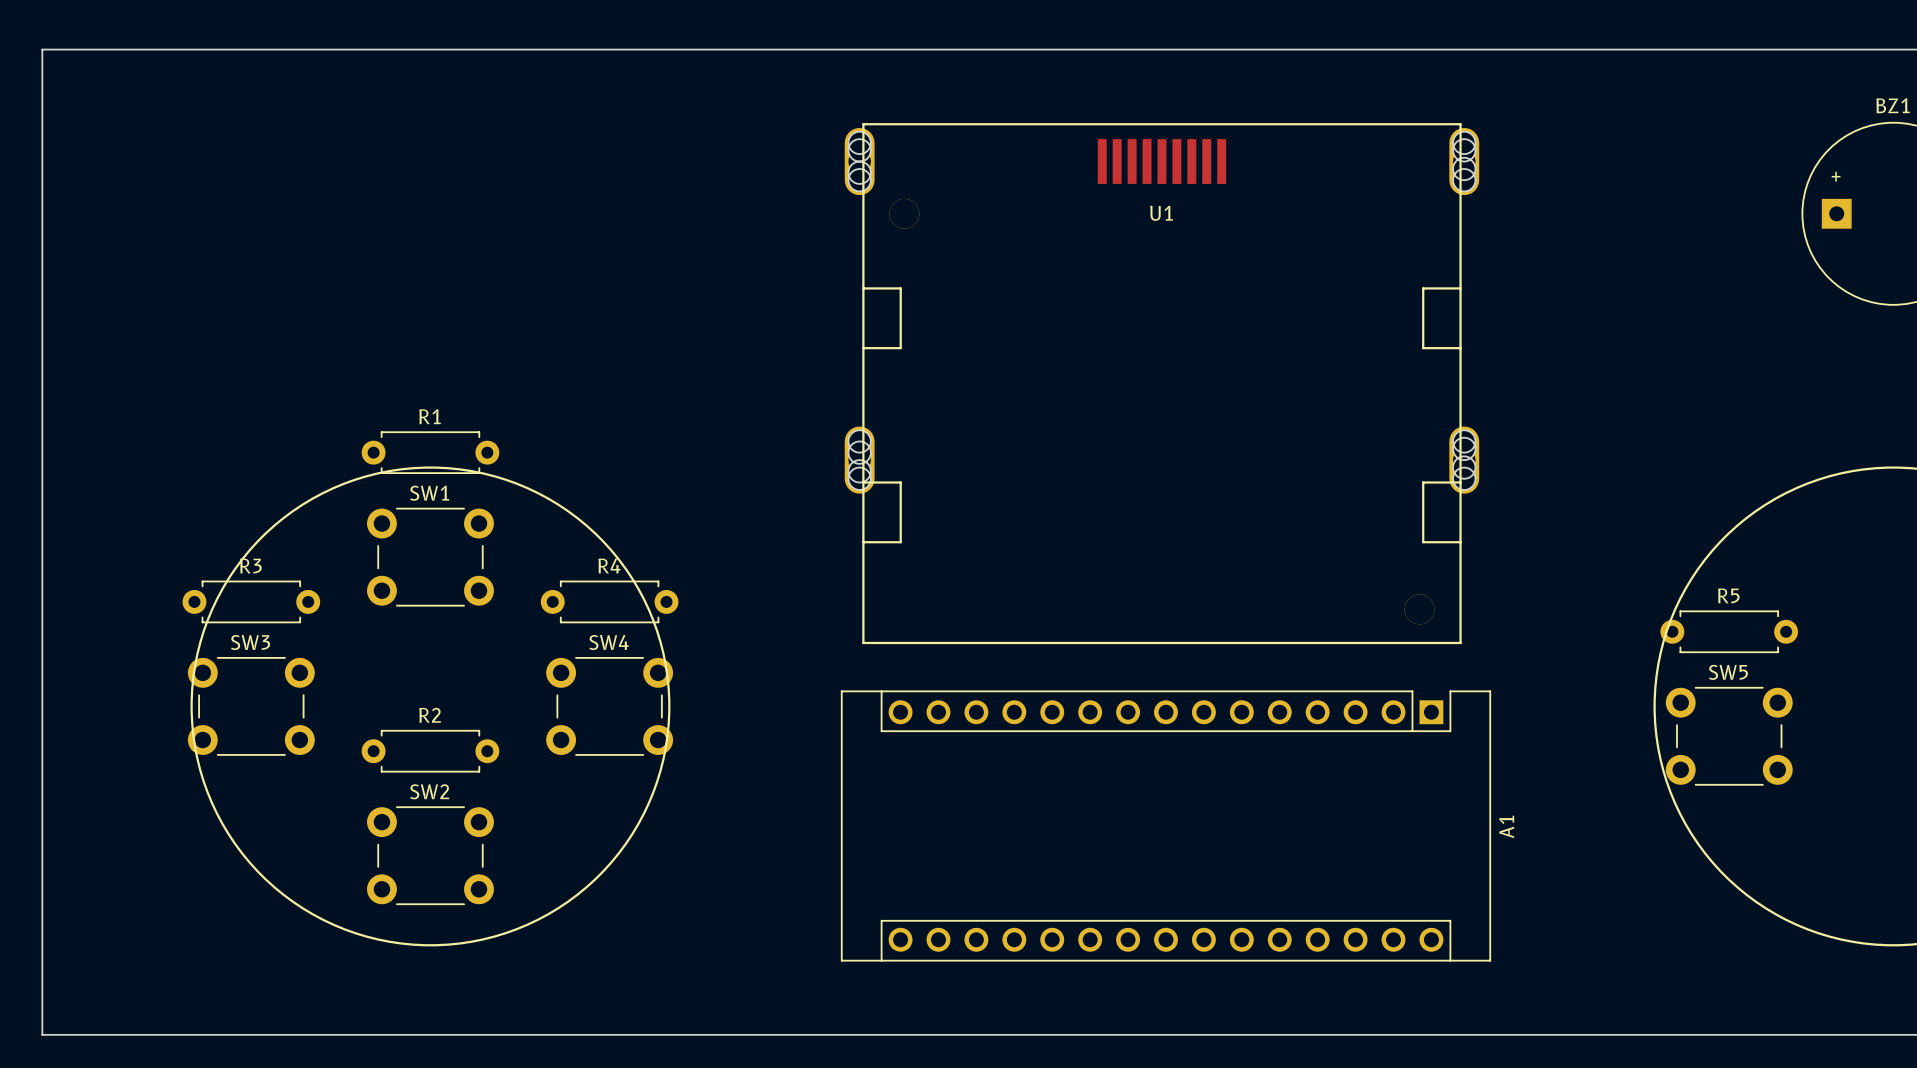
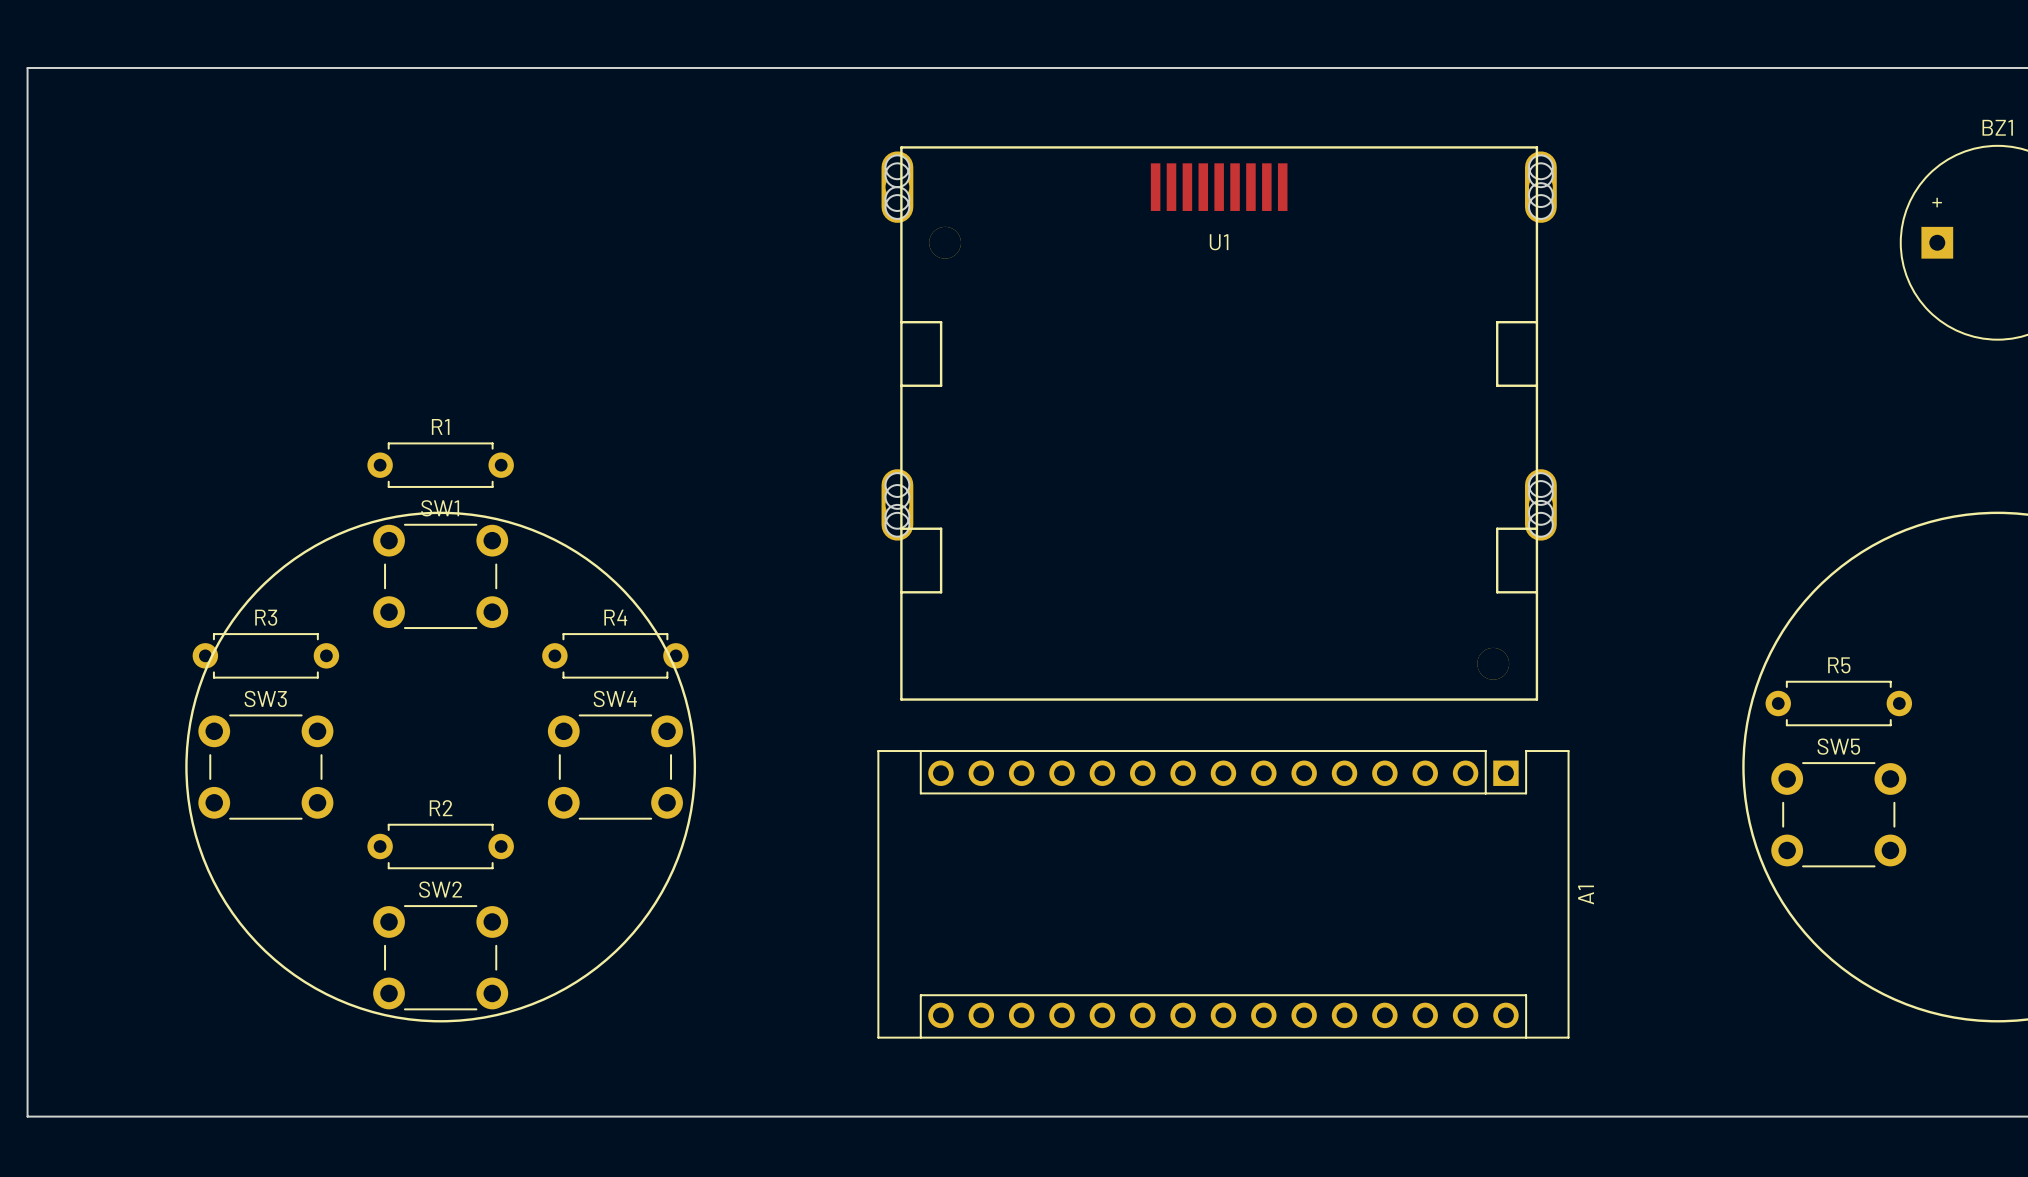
R1 position: (430, 452) -> (440, 465)
SW1 position: (430, 557) -> (440, 576)
R3 position: (251, 601) -> (265, 655)
R4 position: (609, 601) -> (615, 655)
R5 position: (1729, 631) -> (1838, 703)
SW3 position: (251, 706) -> (265, 767)
SW4 position: (609, 706) -> (615, 767)
SW5 position: (1729, 736) -> (1838, 814)
R2 position: (430, 751) -> (440, 846)
SW2 position: (430, 855) -> (440, 957)

